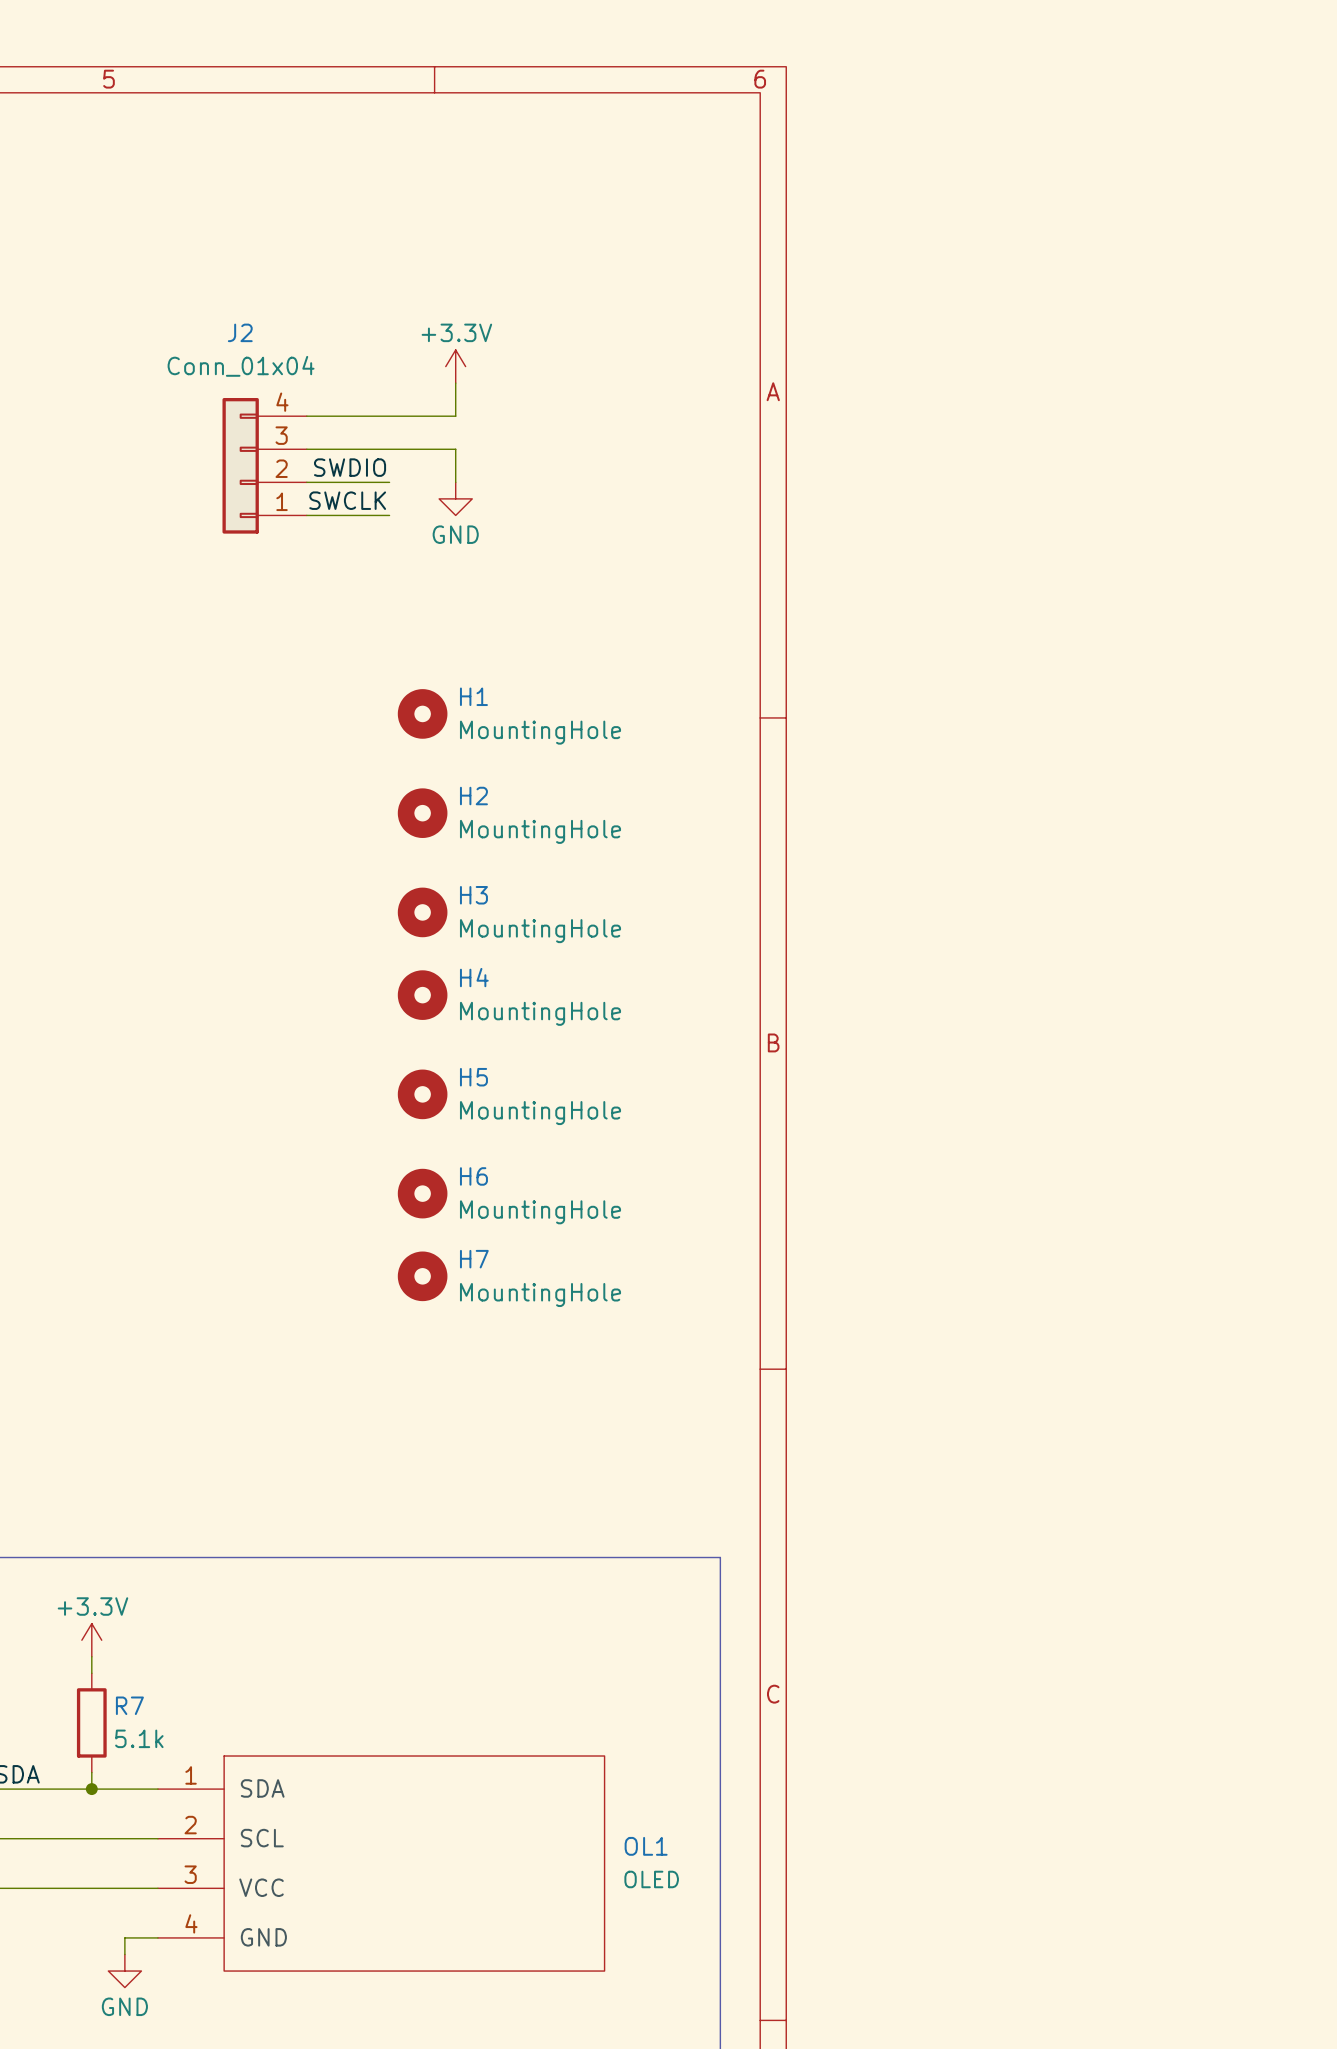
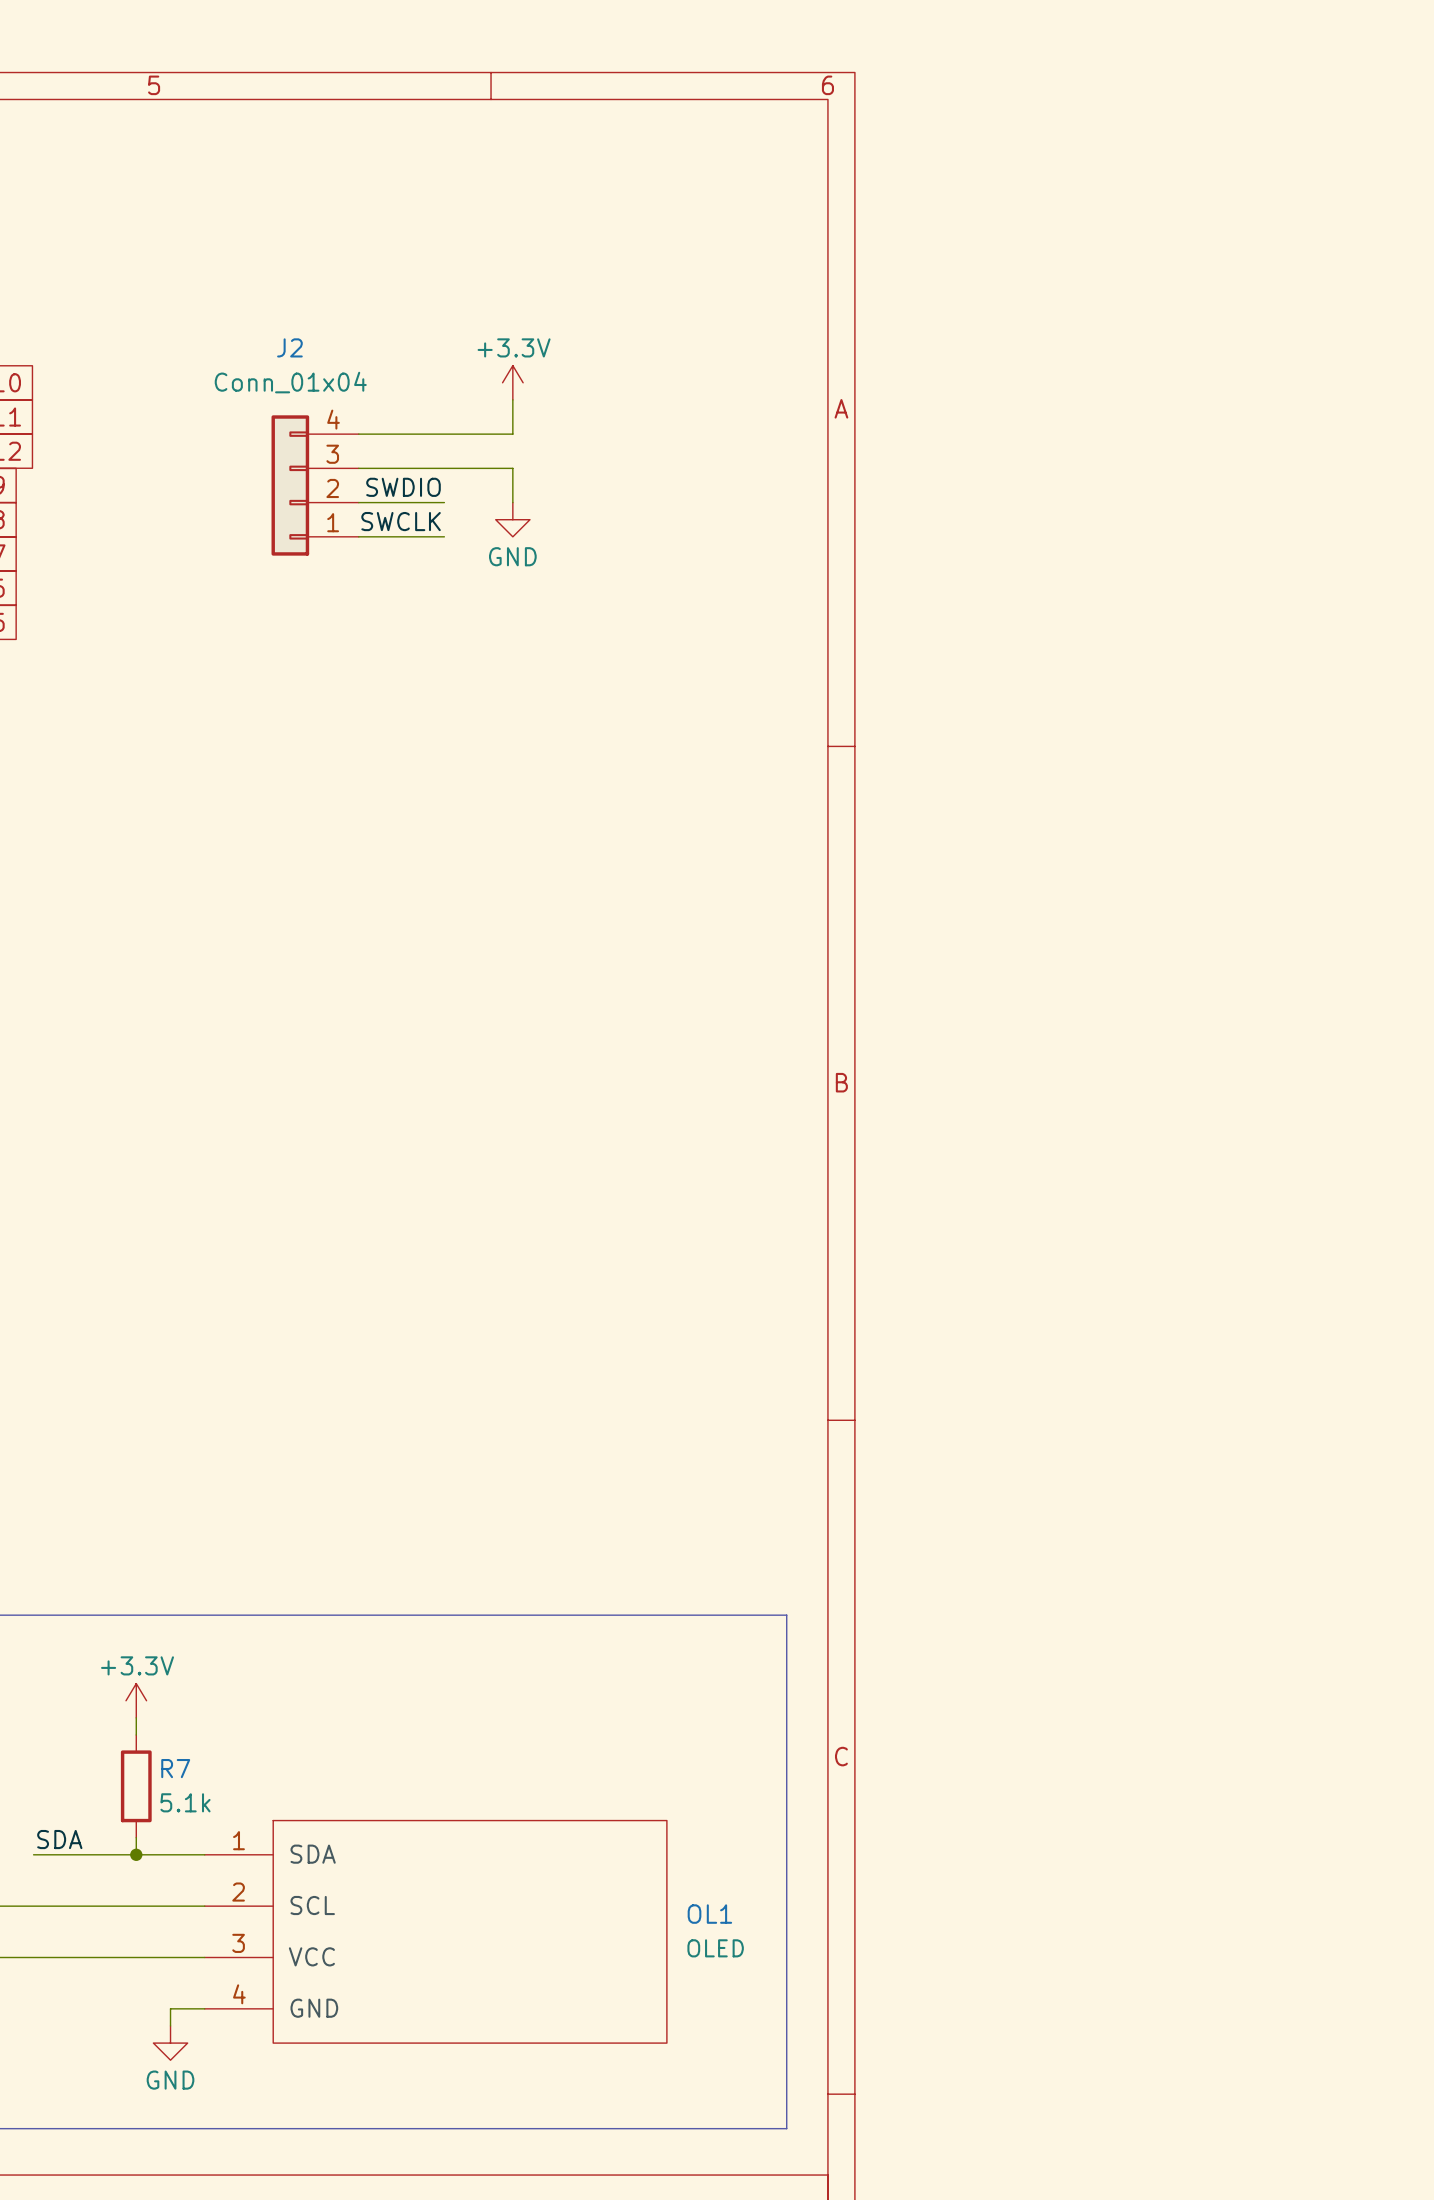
H1: MountingHole (422, 713) -> none
H2: MountingHole (422, 813) -> none
H3: MountingHole (422, 912) -> none
H4: MountingHole (422, 995) -> none
H5: MountingHole (422, 1094) -> none
H6: MountingHole (422, 1193) -> none
H7: MountingHole (422, 1276) -> none

